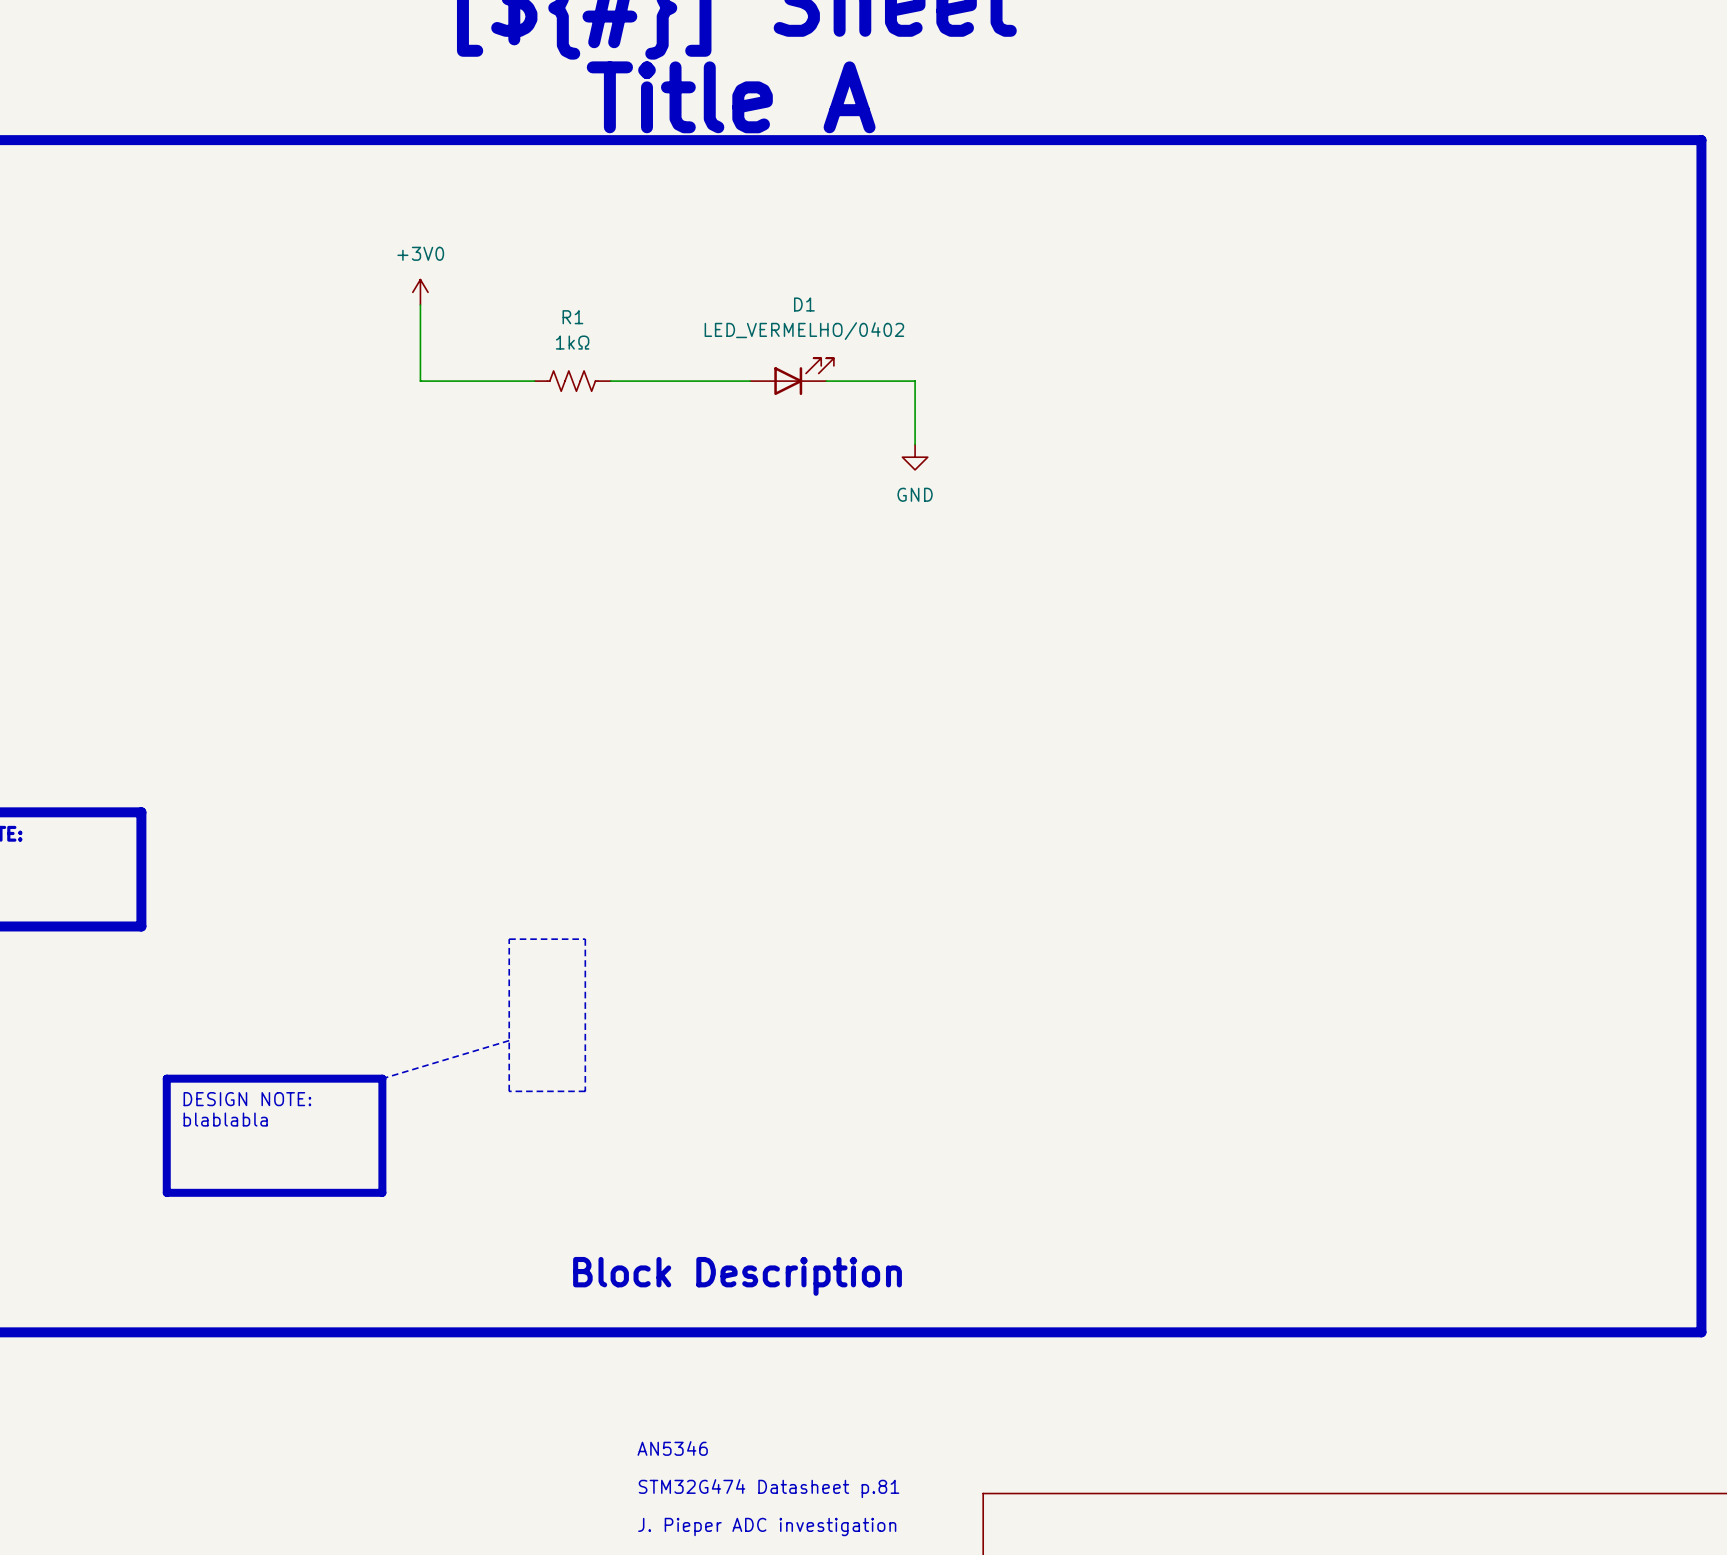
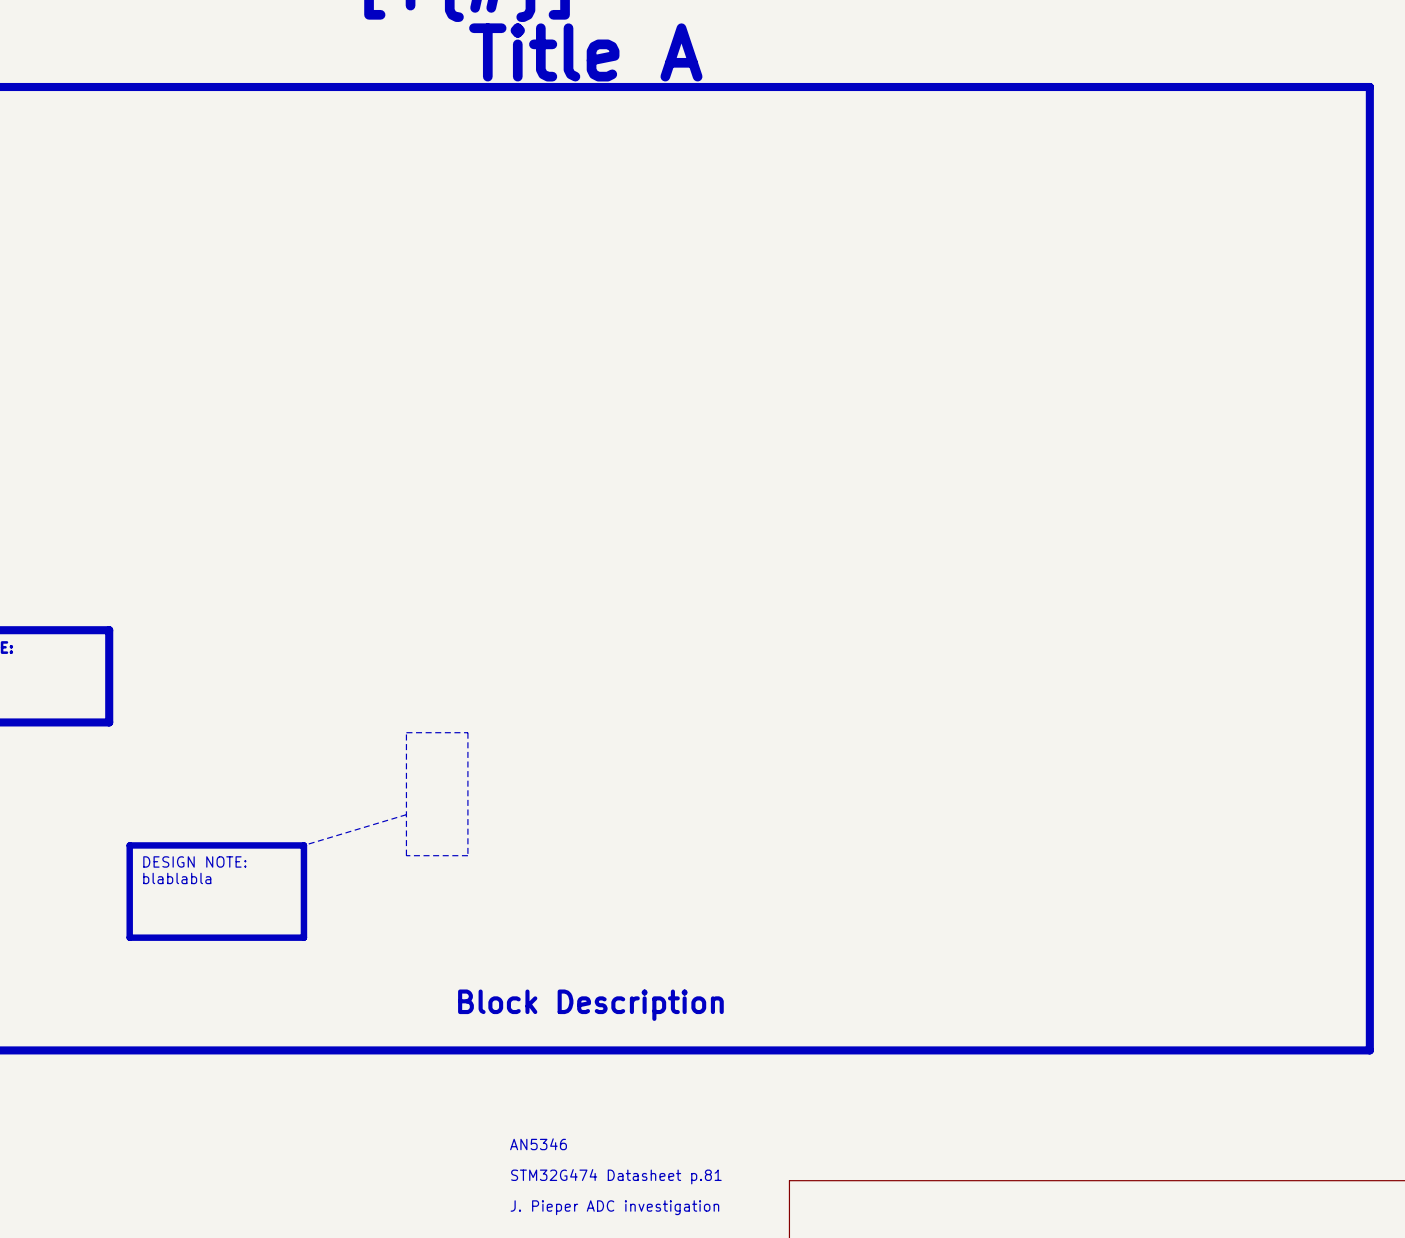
power symbol: +3V0 (420, 292) -> none
wire: (420, 305) (420, 381) (534, 381) -> none
D1: (792, 376) -> none
R1: (572, 381) -> none
wire: (610, 381) (750, 381) -> none
wire: (826, 381) (915, 381) (915, 444) -> none
power symbol: GND (915, 457) -> none

